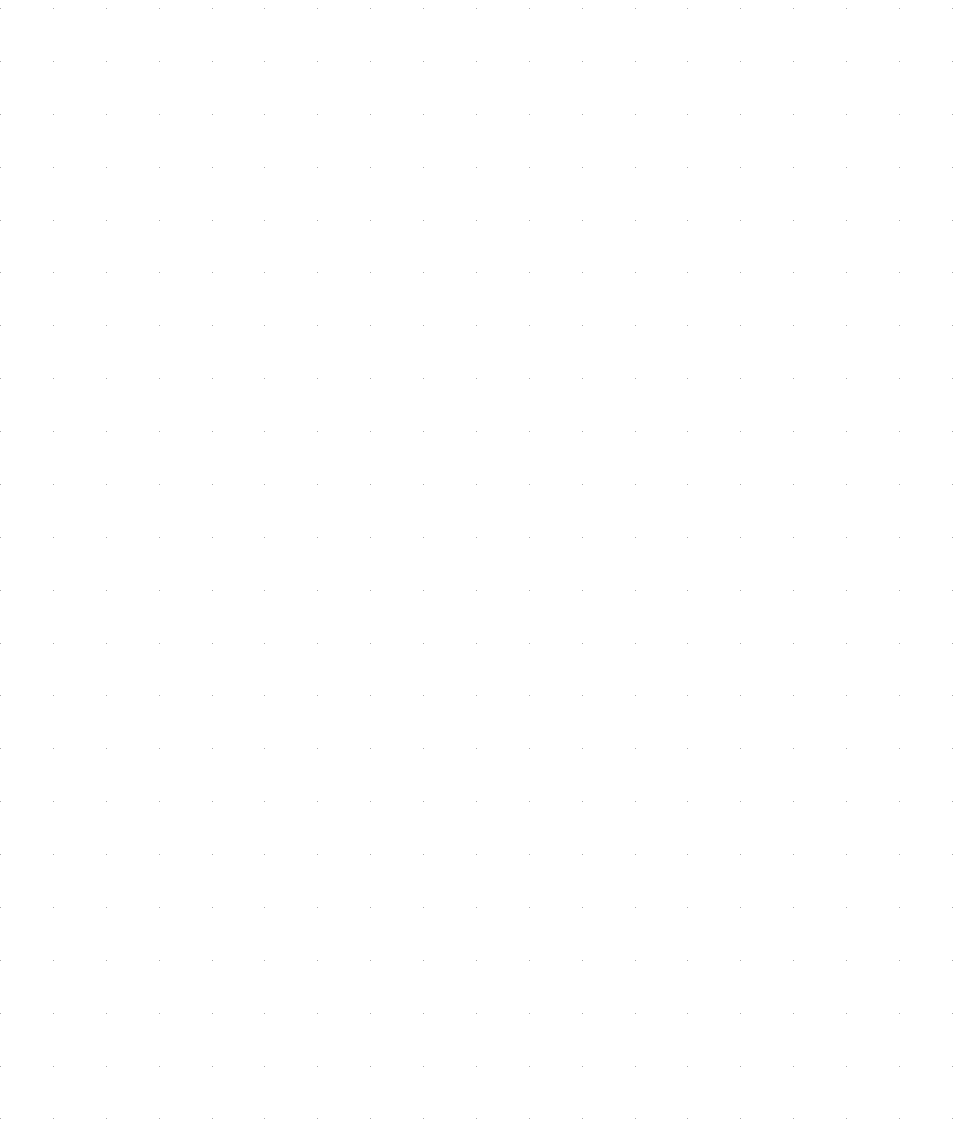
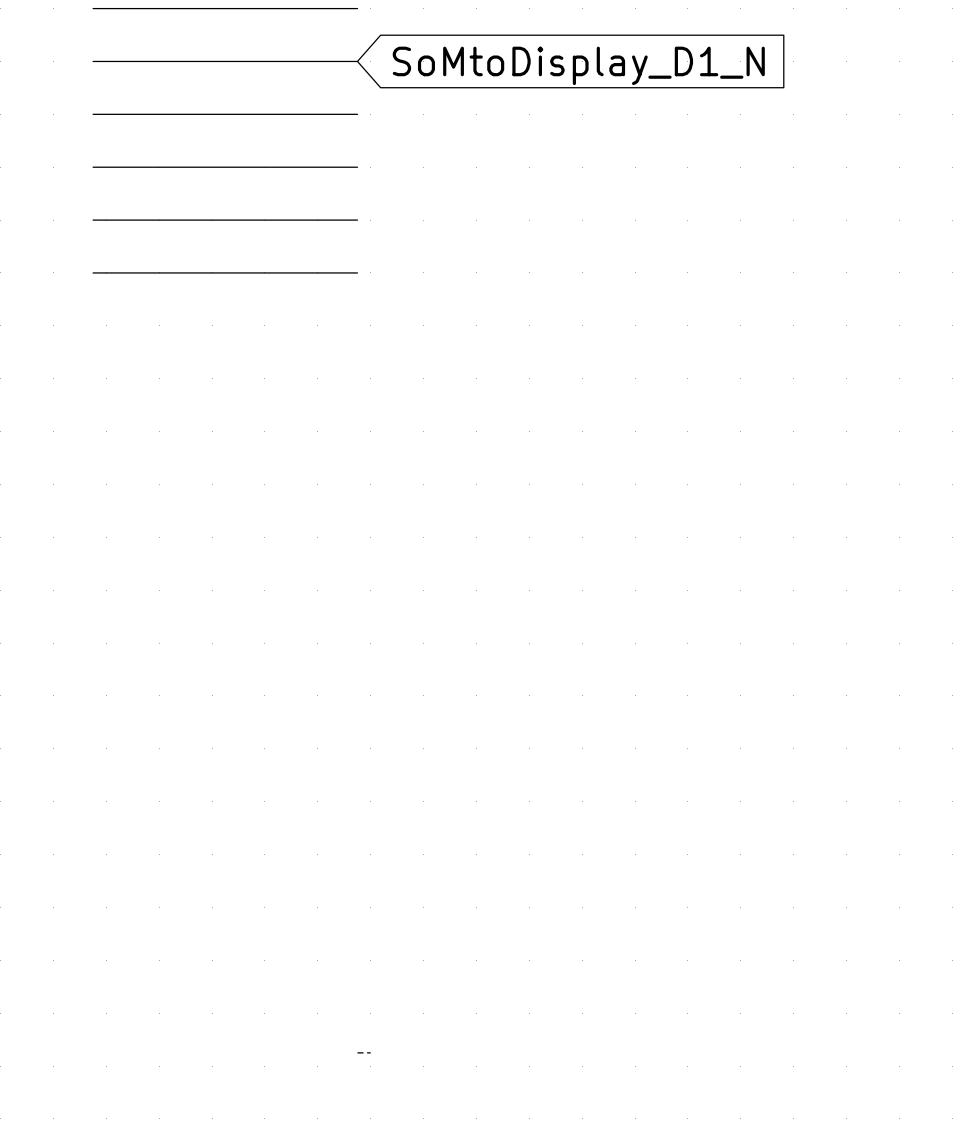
wire: none -> (93, 8) (357, 8)
wire: none -> (93, 61) (357, 61)
global label: none -> SoMtoDisplay_D1_N (578, 65)
wire: none -> (93, 114) (357, 114)
wire: none -> (93, 167) (357, 167)
wire: none -> (93, 220) (357, 220)
wire: none -> (93, 272) (357, 272)
line: none -> (357, 1052) (370, 1052)

